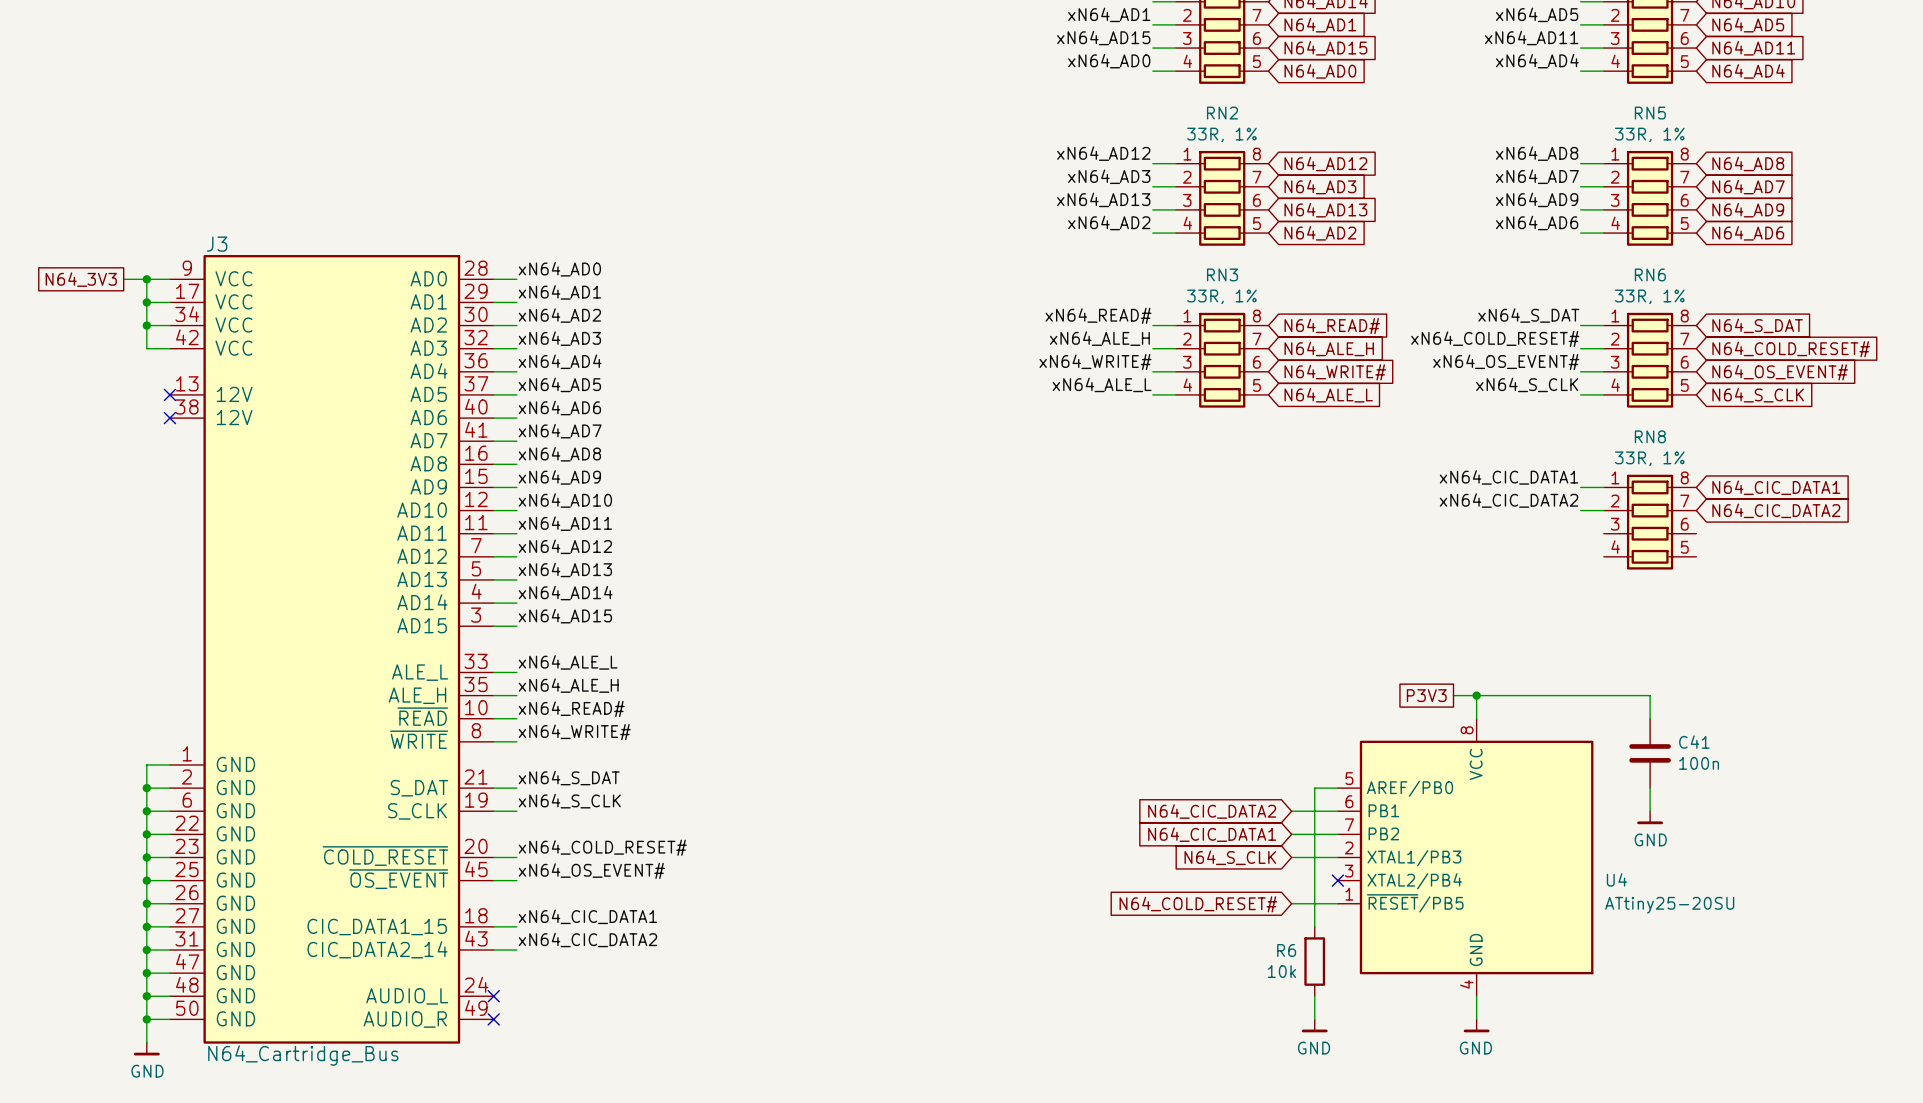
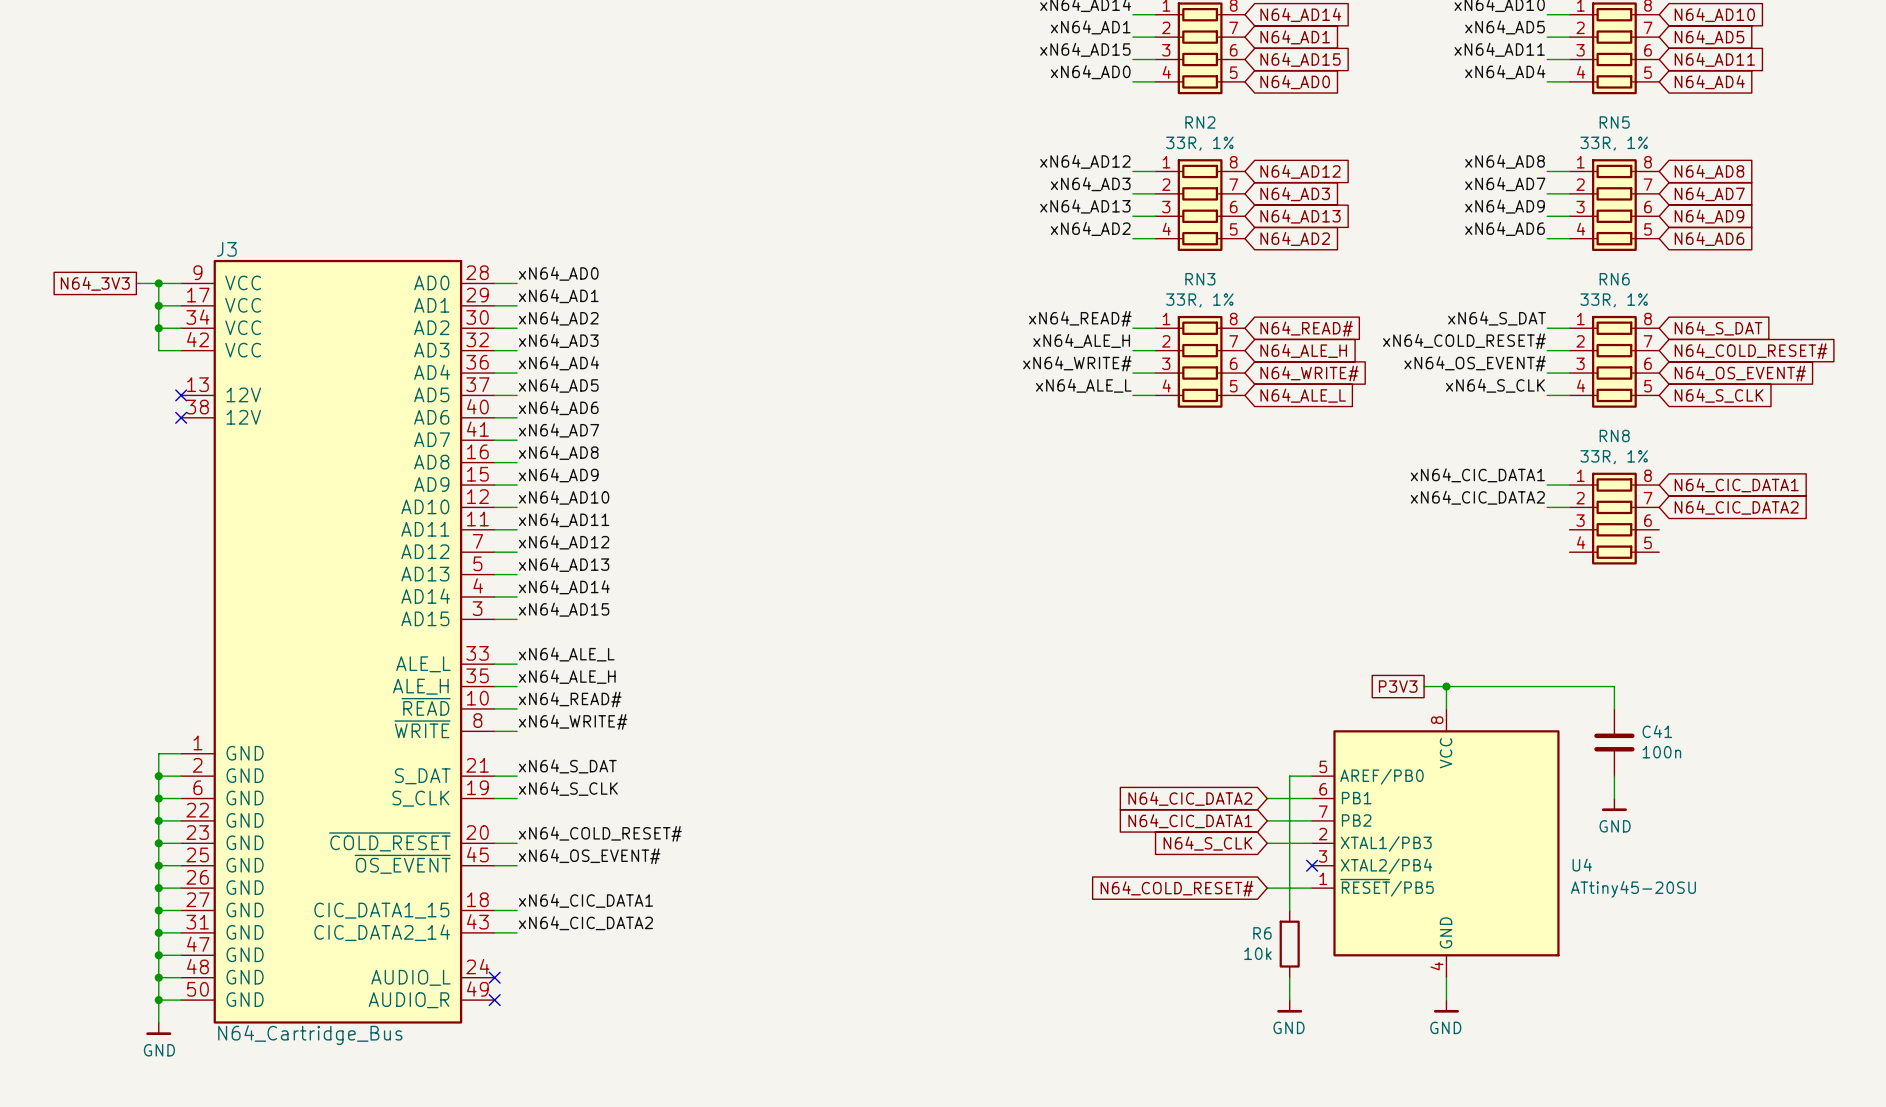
U4 value: ATtiny25-20SU (1669, 905) -> ATtiny45-20SU (1633, 889)

